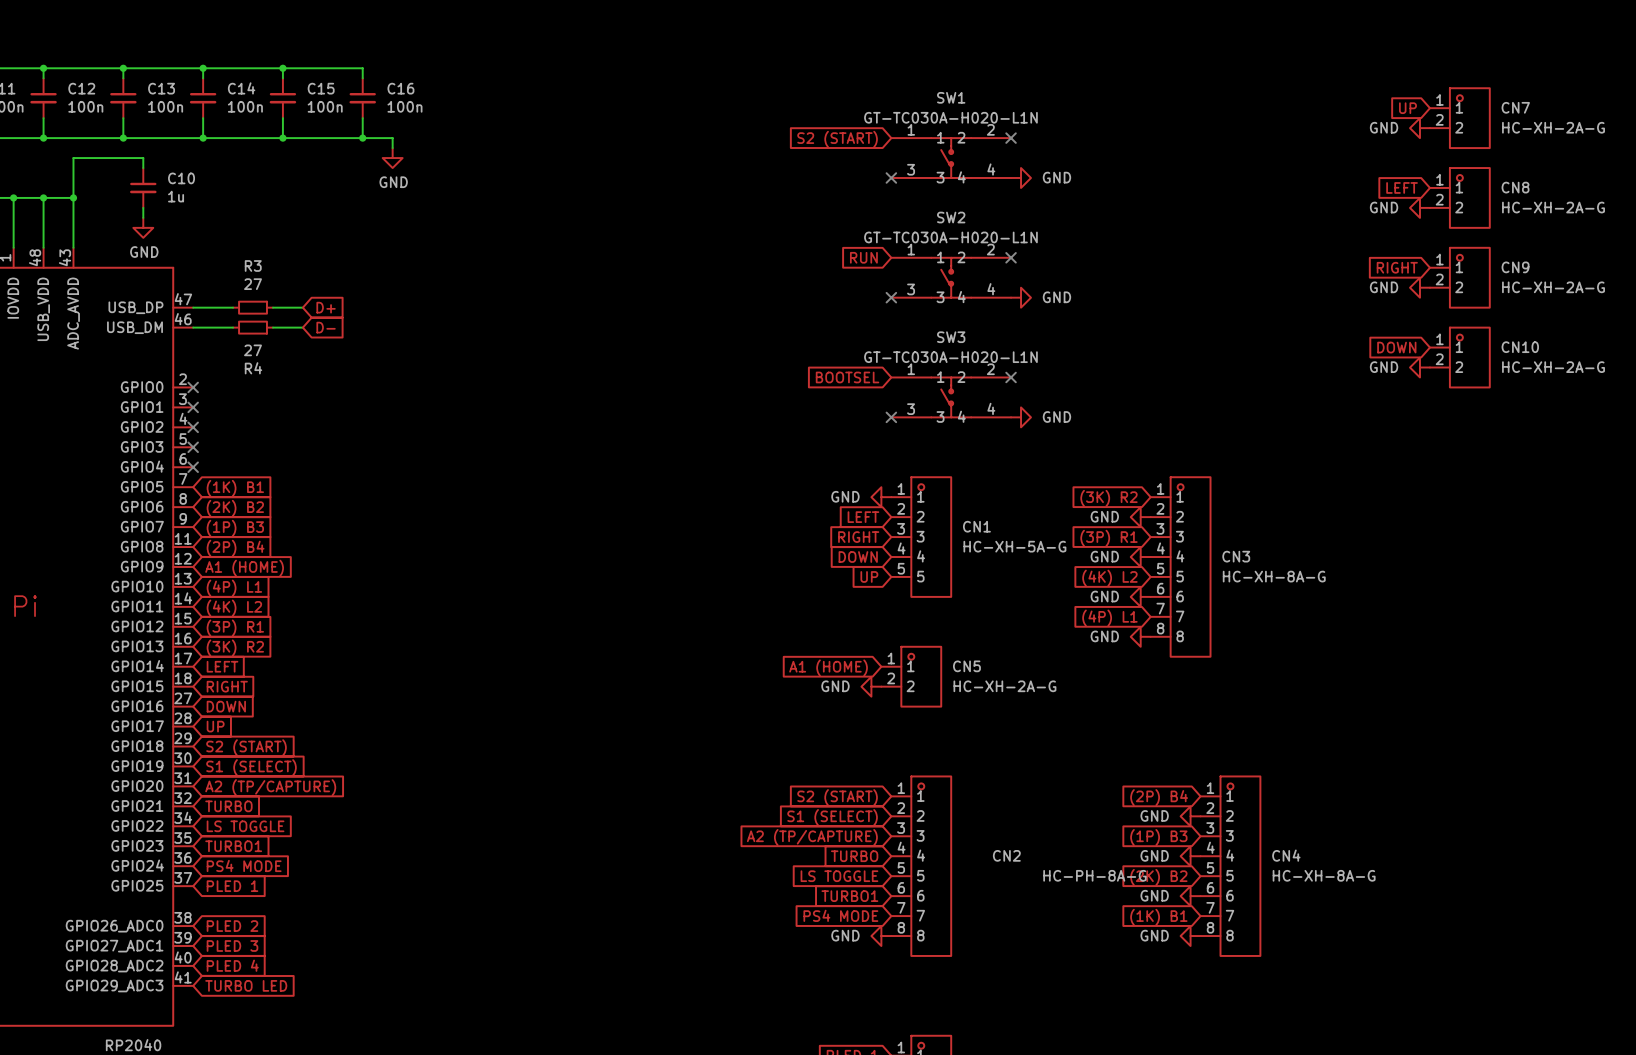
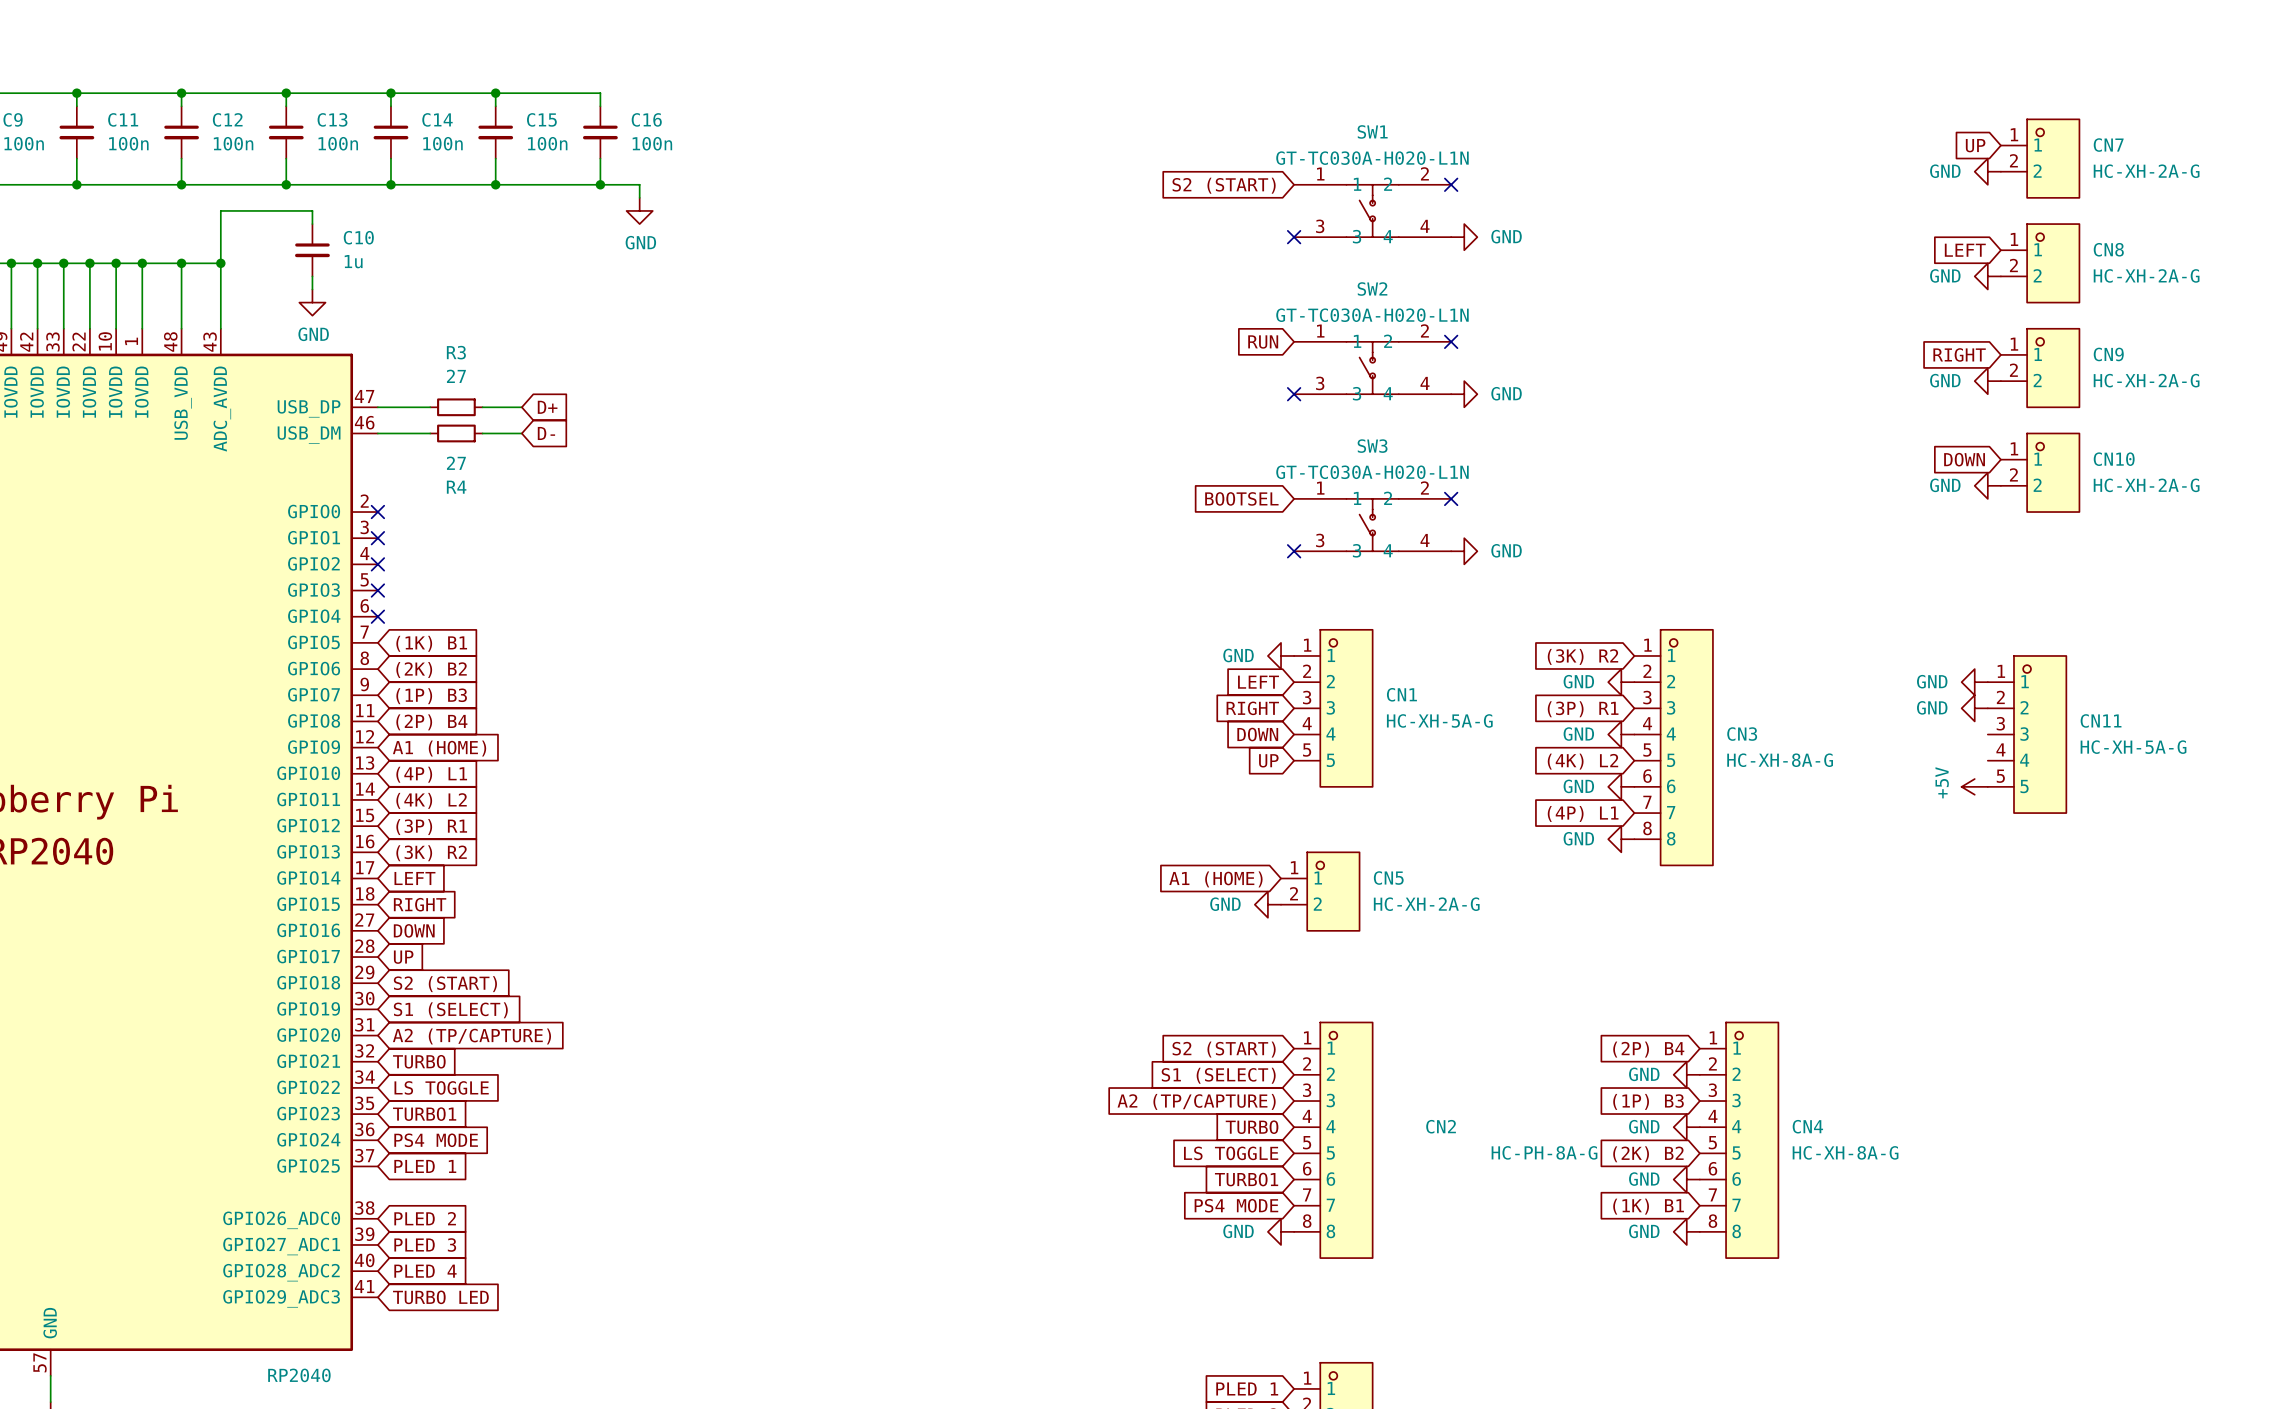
power symbol: none -> GND (1974, 682)
power symbol: none -> GND (1974, 708)
CN11: none -> HC-XH-5A-G (2027, 734)
power symbol: none -> +5V (1974, 786)

